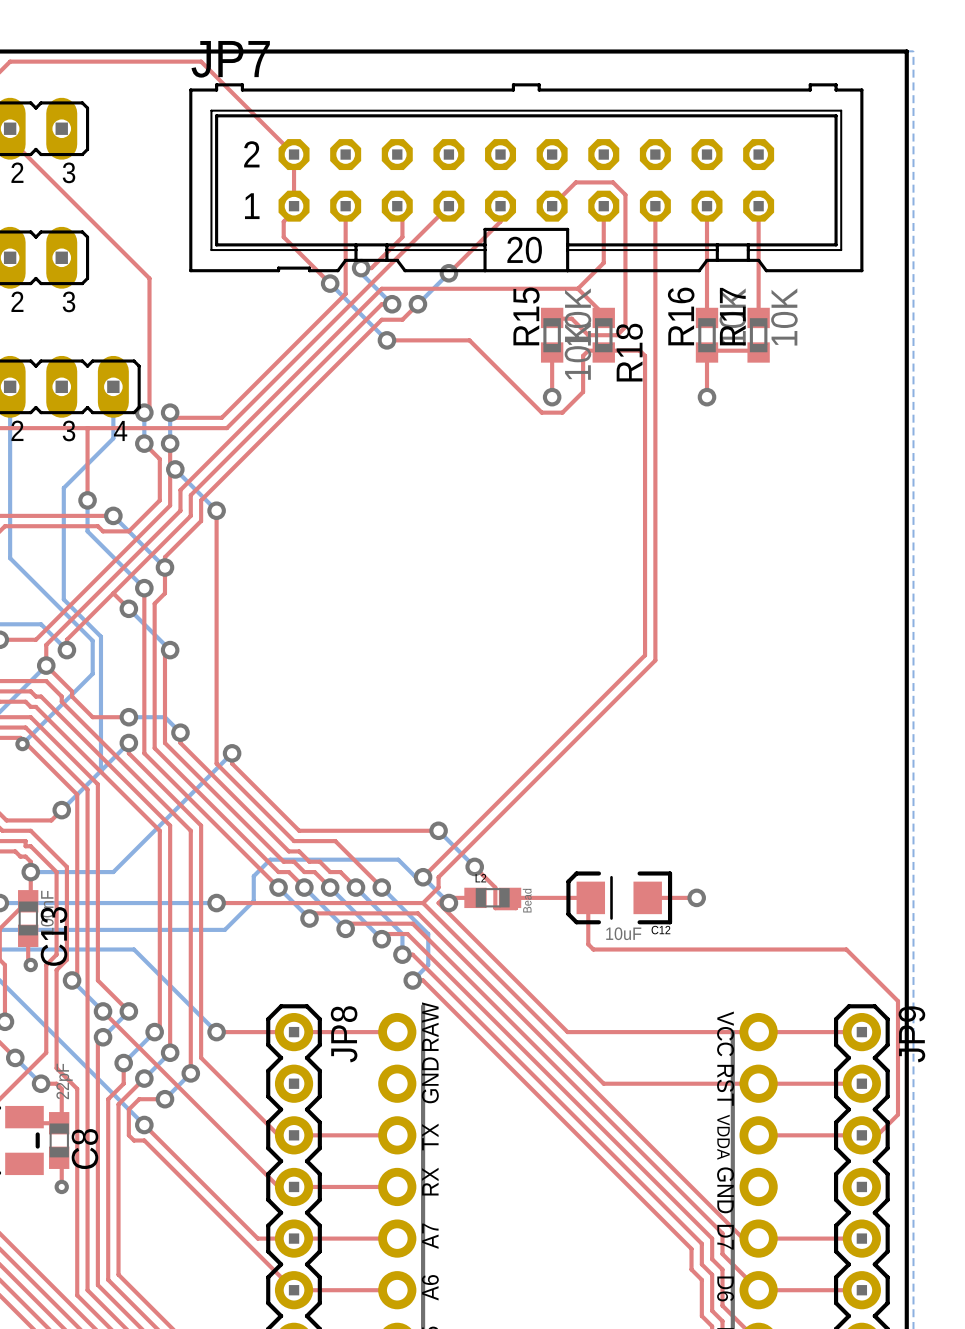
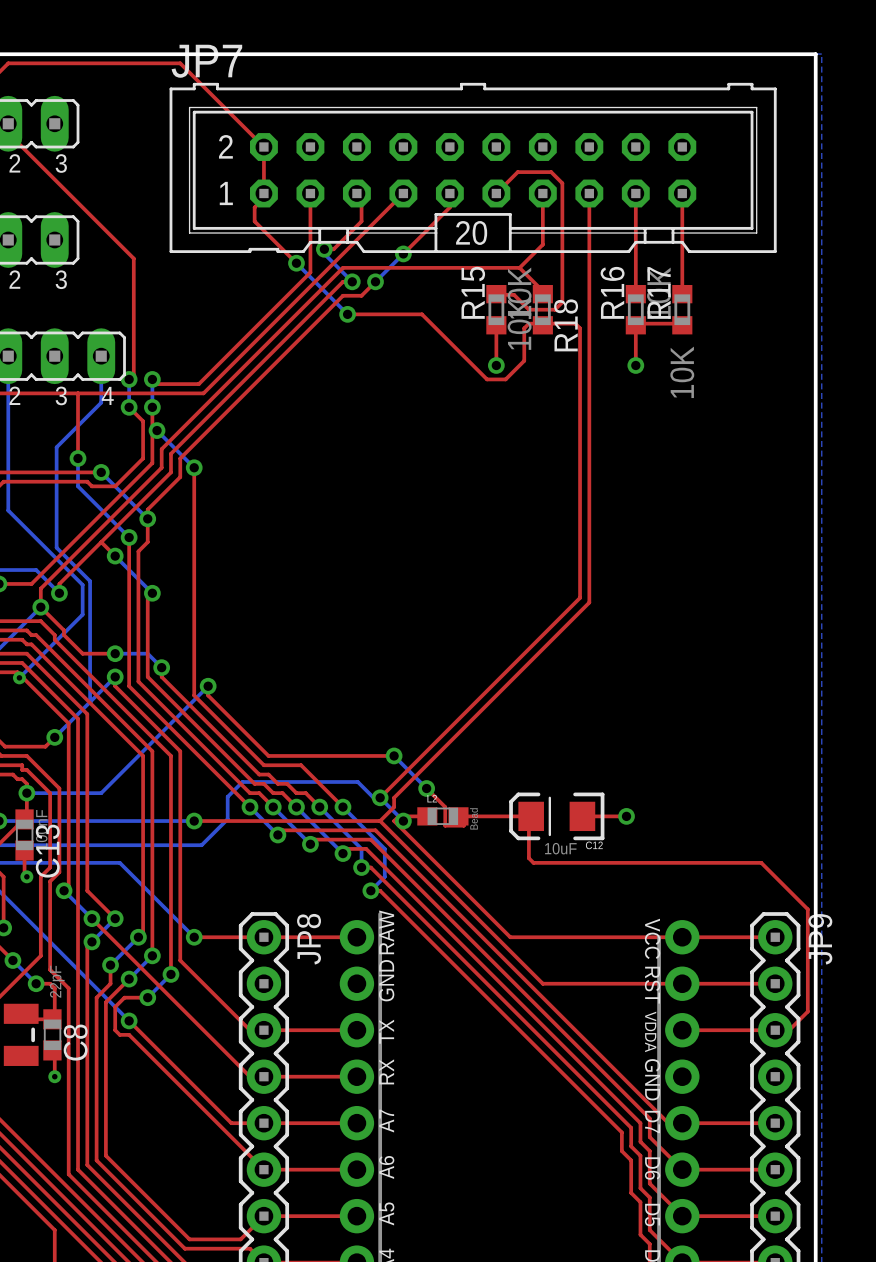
R17 value position: 10K (784, 316) -> 10K (682, 372)

